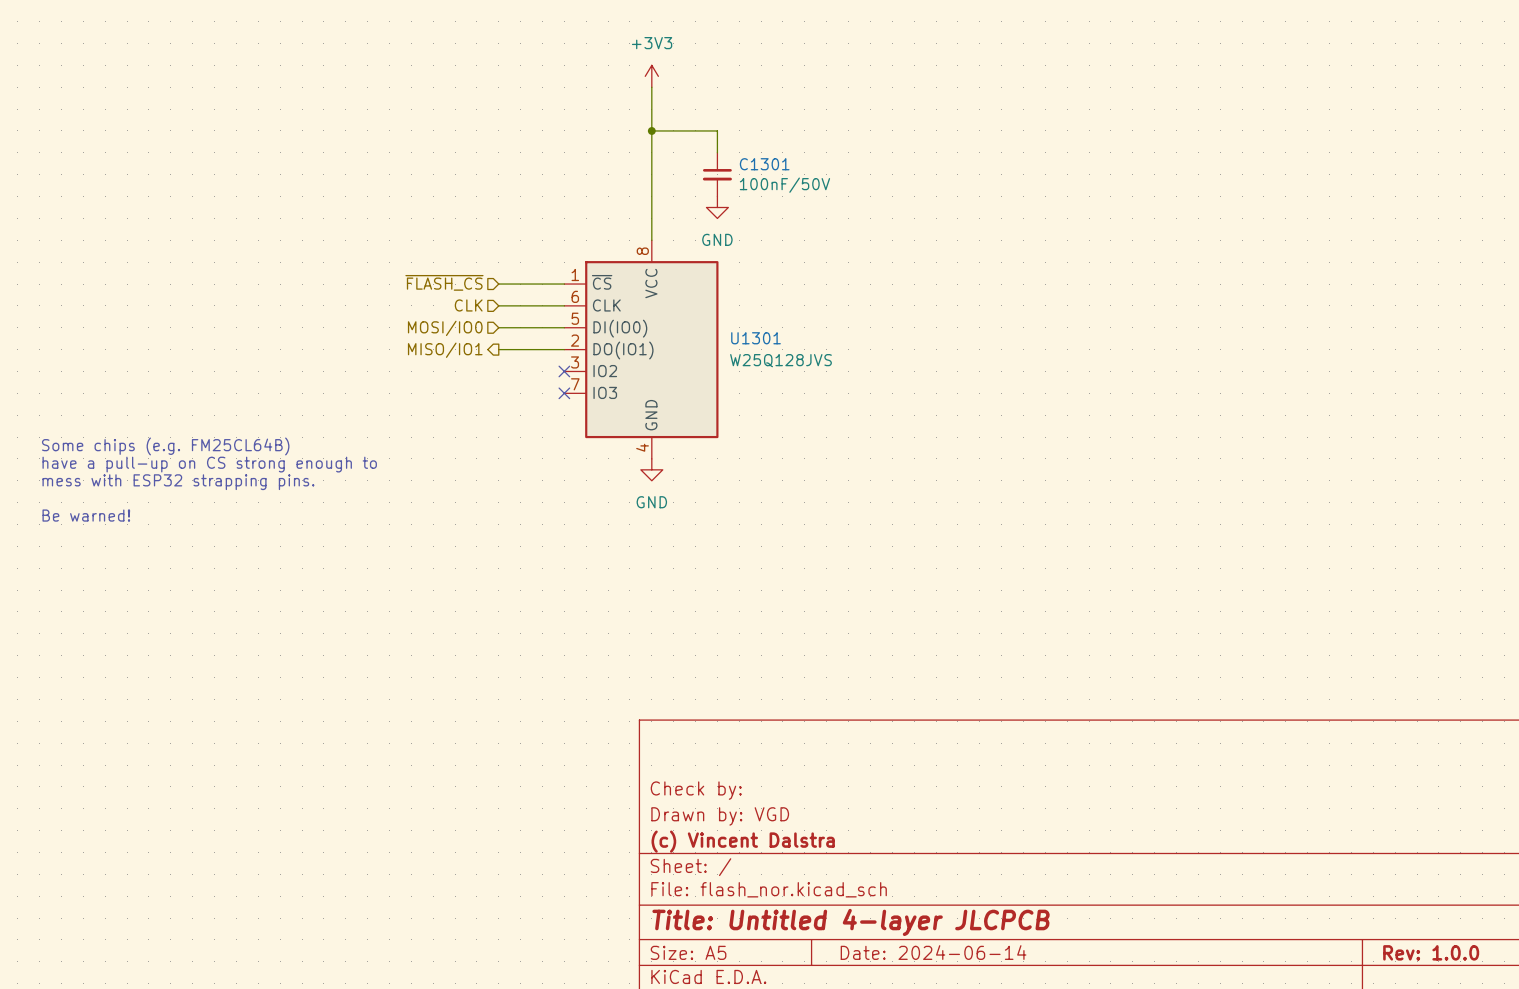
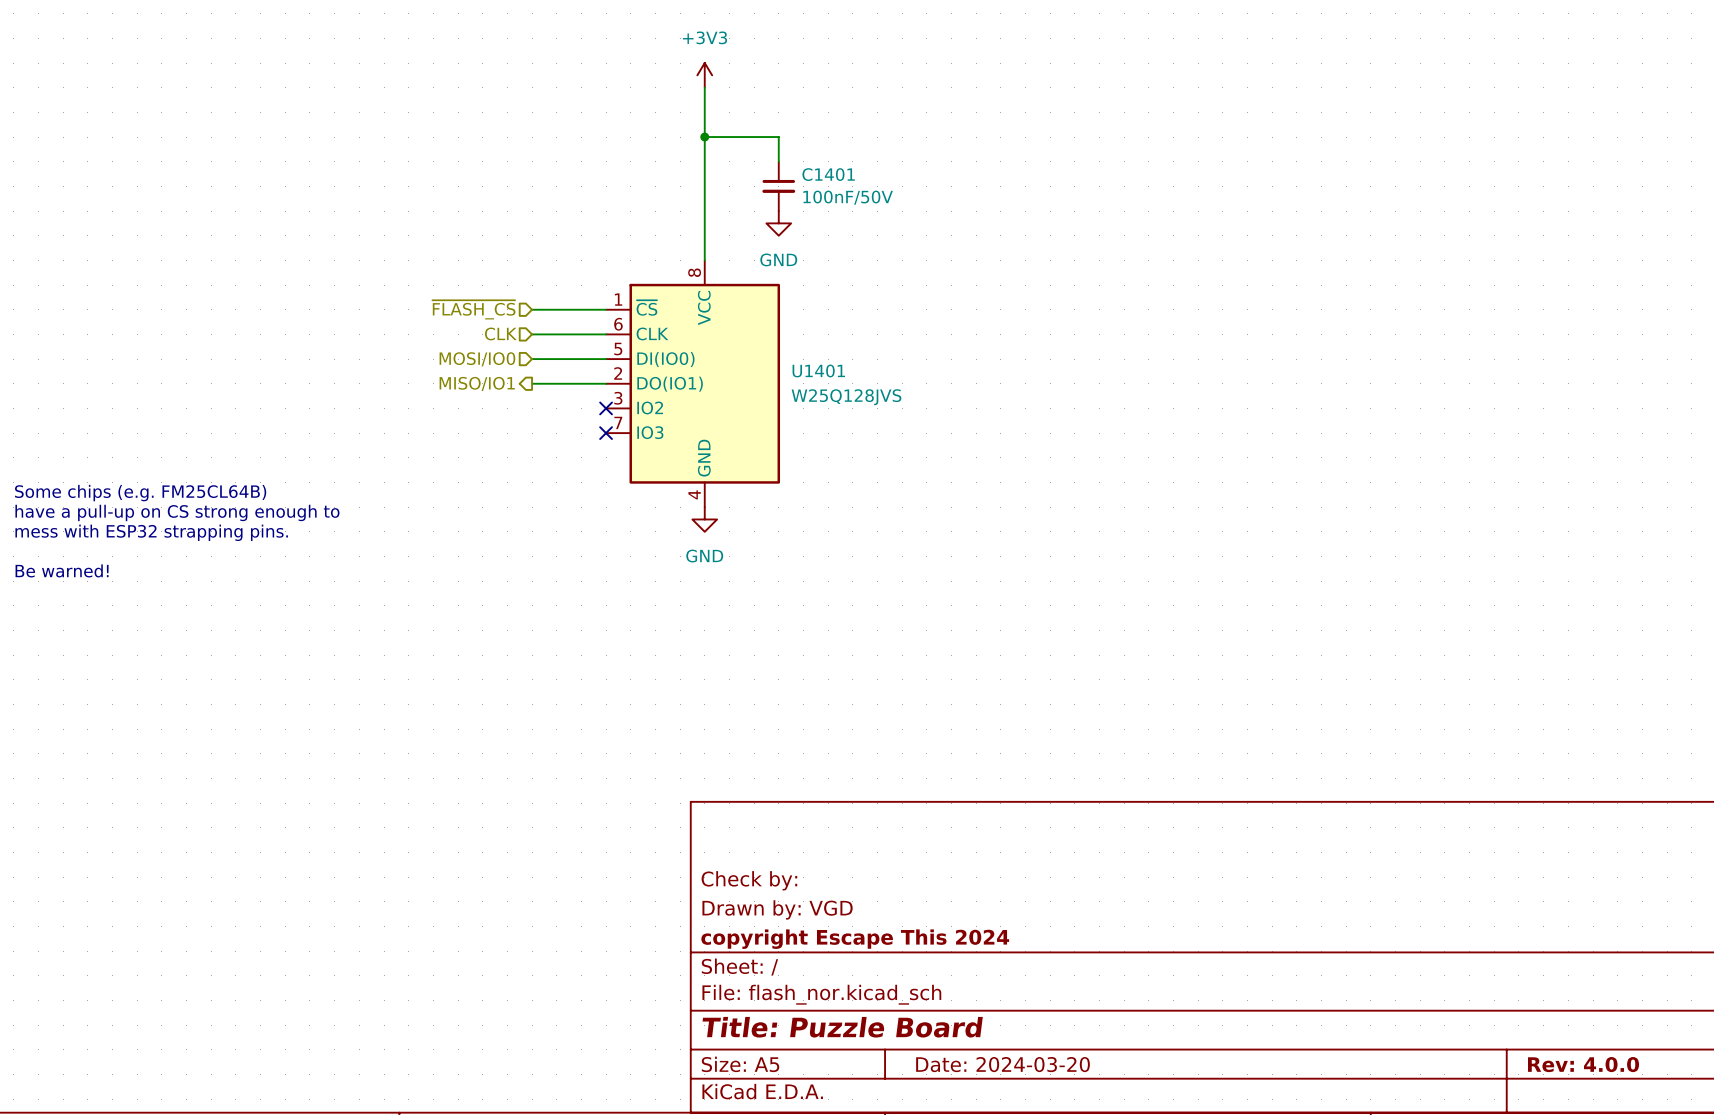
C1301 name: C1301 (764, 164) -> C1401 (828, 174)
U1301 name: U1301 (756, 338) -> U1401 (818, 370)
title block: (c) Vincent Dalstra (743, 841) -> copyright Escape This 2024 (855, 939)
title block: Title: Untitled 4-layer JLCPCB (851, 922) -> Title: Puzzle Board (842, 1027)
title block: Date: 2024-06-14 (933, 952) -> Date: 2024-03-20 (1003, 1064)
title block: Rev: 1.0.0 (1431, 952) -> Rev: 4.0.0 (1583, 1064)

